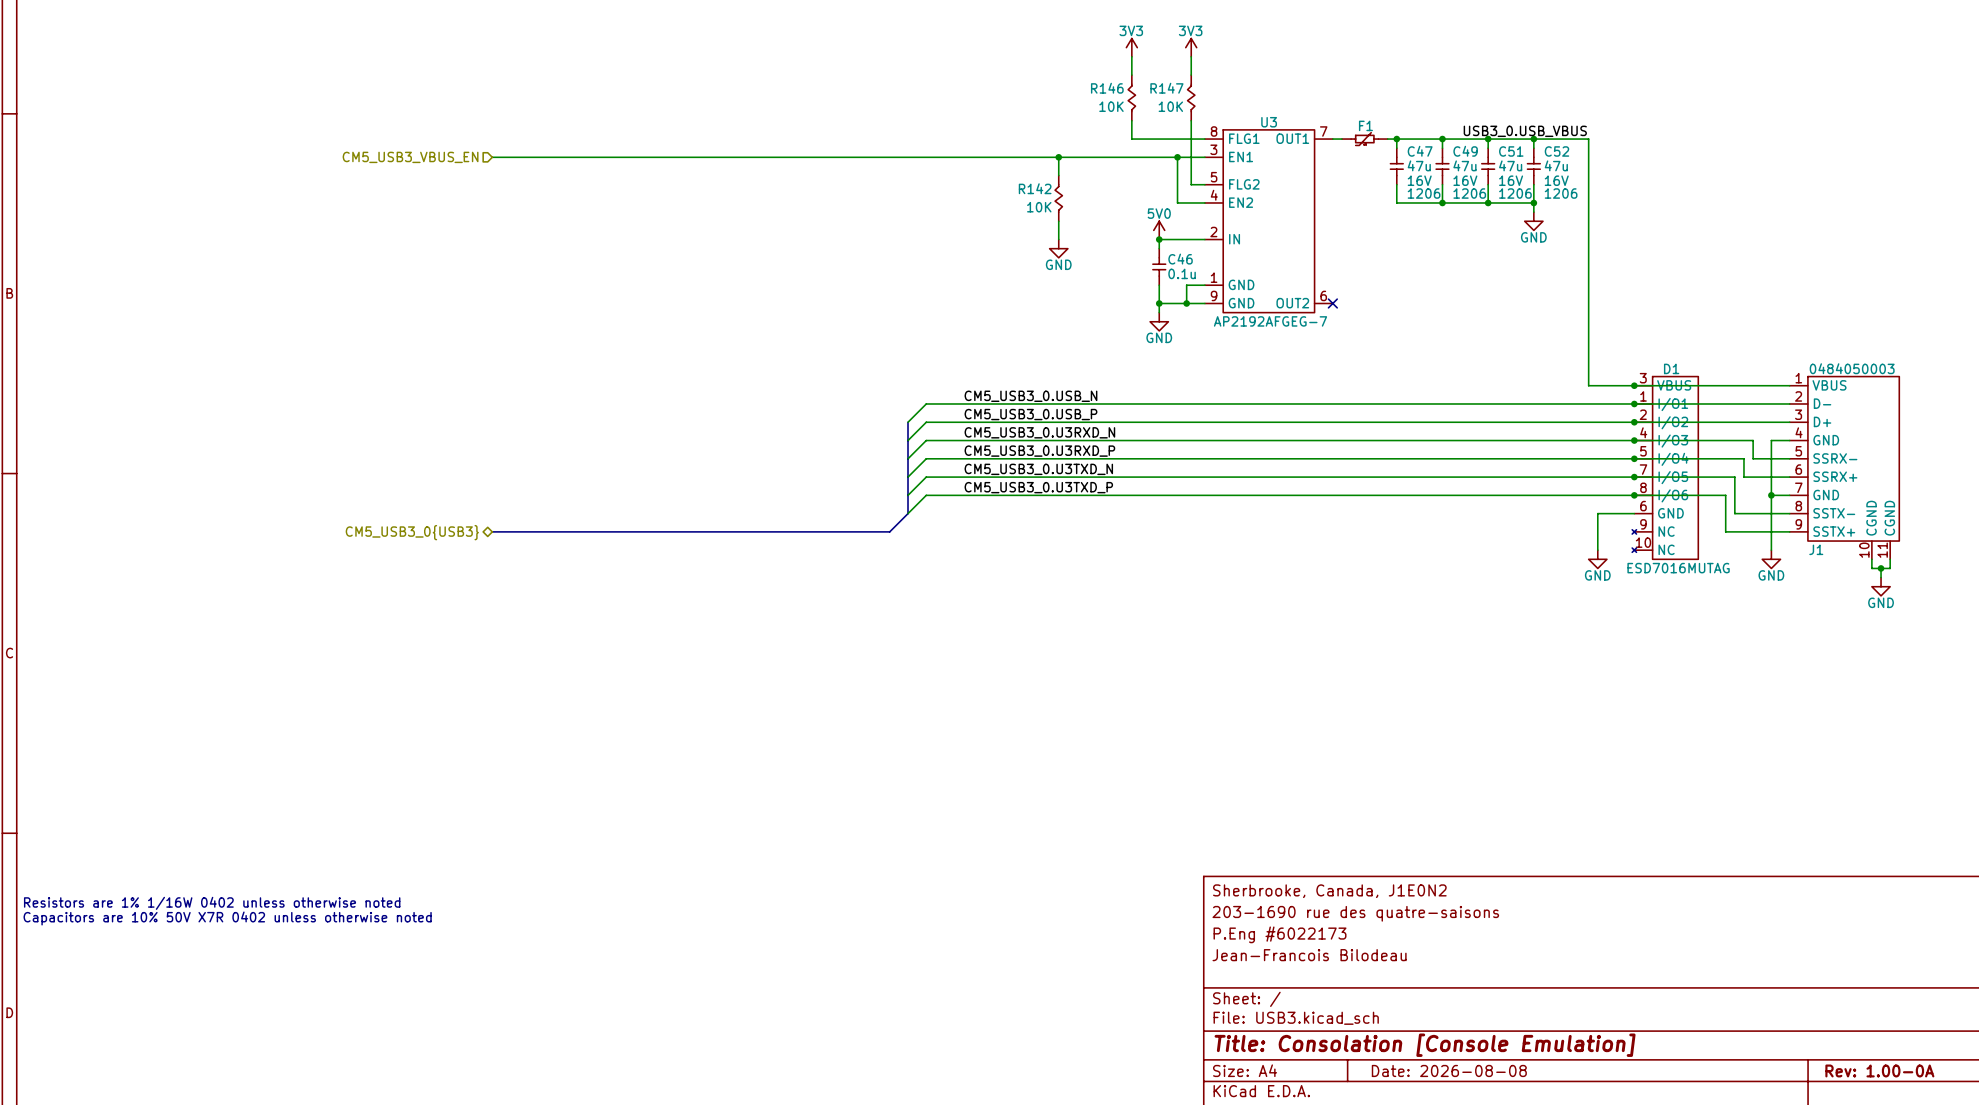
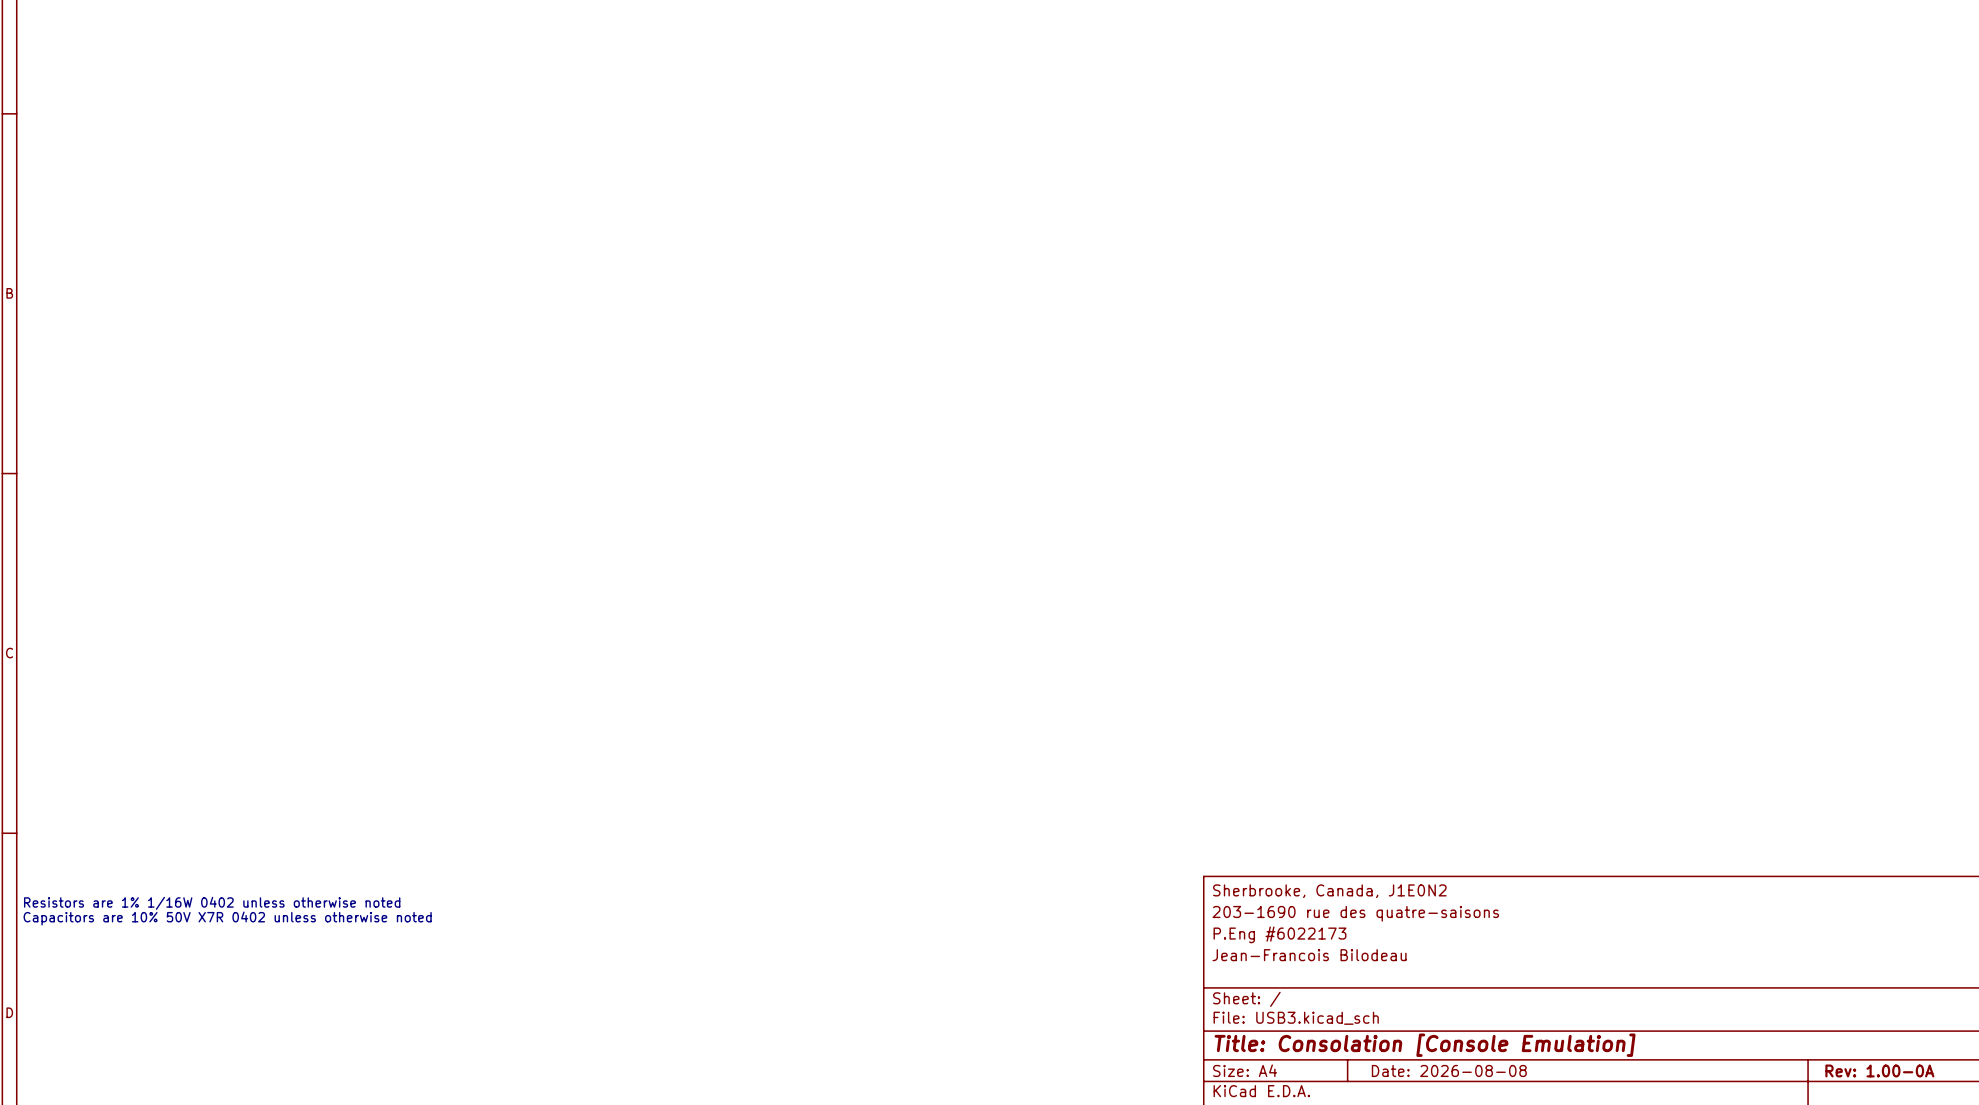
power symbol: 3V3 (1131, 47) -> none
power symbol: 3V3 (1191, 47) -> none
wire: (1131, 56) (1131, 75) -> none
wire: (1191, 56) (1191, 75) -> none
R146: 10K (1131, 97) -> none
R147: 10K (1191, 97) -> none
wire: (1131, 120) (1131, 139) (1204, 139) -> none
wire: (1191, 120) (1191, 184) (1204, 184) -> none
label: USB3_0.USB_VBUS (1525, 131) -> none
wire: (1332, 139) (1341, 139) -> none
F1: (1364, 139) -> none
wire: (1387, 139) (1588, 139) (1588, 385) (1789, 385) -> none
wire: (1396, 139) (1396, 148) -> none
junction: (1396, 139) -> none
wire: (1442, 139) (1442, 148) -> none
junction: (1442, 139) -> none
wire: (1488, 139) (1488, 148) -> none
junction: (1488, 139) -> none
wire: (1533, 139) (1533, 148) -> none
junction: (1533, 139) -> none
hierarchical label: CM5_USB3_VBUS_EN (410, 157) -> none
wire: (492, 157) (1204, 157) -> none
wire: (1058, 157) (1058, 175) -> none
junction: (1058, 157) -> none
wire: (1177, 157) (1177, 202) (1204, 202) -> none
junction: (1177, 157) -> none
C47: 47u (1396, 166) -> none
C49: 47u (1442, 166) -> none
C51: 47u (1488, 166) -> none
C52: 47u (1533, 166) -> none
wire: (1396, 184) (1396, 202) (1533, 202) -> none
wire: (1442, 184) (1442, 202) -> none
wire: (1488, 184) (1488, 202) -> none
wire: (1533, 184) (1533, 212) -> none
R142: 10K (1058, 198) -> none
junction: (1442, 202) -> none
junction: (1488, 202) -> none
junction: (1533, 202) -> none
wire: (1058, 221) (1058, 239) -> none
U3: AP2192AFGEG-7 (1268, 221) -> none
power symbol: GND (1533, 221) -> none
power symbol: 5V0 (1159, 230) -> none
junction: (1159, 239) -> none
wire: (1204, 239) (1159, 239) (1159, 248) -> none
power symbol: GND (1058, 248) -> none
C46: 0.1u (1159, 266) -> none
wire: (1159, 285) (1159, 312) -> none
wire: (1204, 285) (1186, 285) (1186, 303) -> none
wire: (1159, 303) (1204, 303) -> none
junction: (1159, 303) -> none
junction: (1186, 303) -> none
no-connect mark: (1332, 303) -> none
power symbol: GND (1159, 321) -> none
junction: (1634, 385) -> none
label: CM5_USB3_0.USB_N (1030, 396) -> none
junction: (1634, 403) -> none
wire: (1789, 403) (926, 403) (908, 422) -> none
label: CM5_USB3_0.USB_P (1030, 414) -> none
bus: (908, 422) (908, 513) (889, 531) (492, 531) -> none
junction: (1634, 422) -> none
wire: (1789, 422) (926, 422) (908, 440) -> none
label: CM5_USB3_0.U3RXD_N (1039, 432) -> none
junction: (1634, 440) -> none
wire: (1789, 440) (1771, 440) (1771, 550) -> none
label: CM5_USB3_0.U3RXD_P (1039, 451) -> none
wire: (908, 458) (926, 440) (1753, 440) (1753, 458) (1789, 458) -> none
junction: (1634, 458) -> none
D1: ESD7016MUTAG (1665, 467) -> none
J1: 0484050003 (1844, 467) -> none
label: CM5_USB3_0.U3TXD_N (1038, 469) -> none
wire: (908, 477) (926, 458) (1743, 458) (1743, 477) (1789, 477) -> none
junction: (1634, 477) -> none
label: CM5_USB3_0.U3TXD_P (1038, 487) -> none
wire: (908, 495) (926, 477) (1734, 477) (1734, 513) (1789, 513) -> none
junction: (1634, 495) -> none
wire: (1771, 495) (1789, 495) -> none
junction: (1771, 495) -> none
wire: (908, 513) (926, 495) (1725, 495) (1725, 531) (1789, 531) -> none
wire: (1634, 513) (1597, 513) (1597, 550) -> none
hierarchical label: CM5_USB3_0{USB3} (412, 532) -> none
power symbol: GND (1597, 559) -> none
power symbol: GND (1771, 559) -> none
wire: (1871, 559) (1871, 568) (1890, 568) (1890, 559) -> none
wire: (1881, 568) (1881, 577) -> none
junction: (1881, 568) -> none
power symbol: GND (1881, 586) -> none

